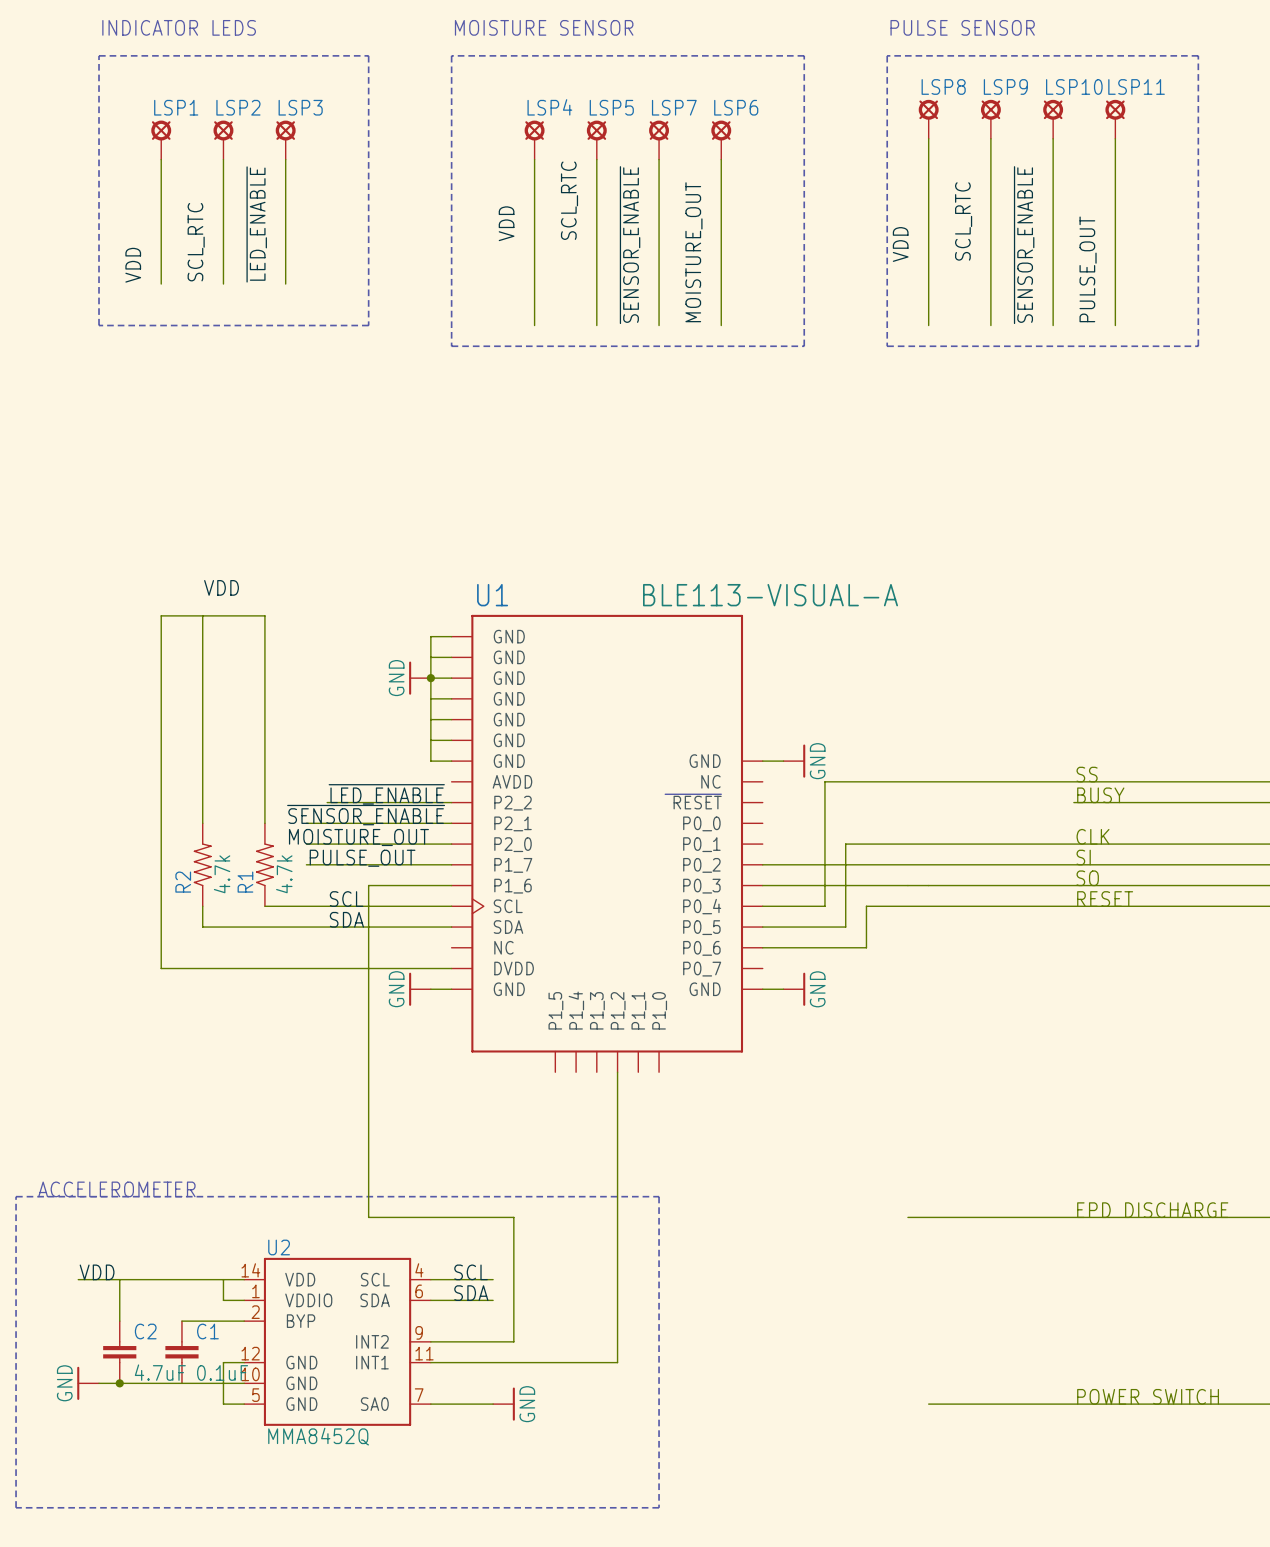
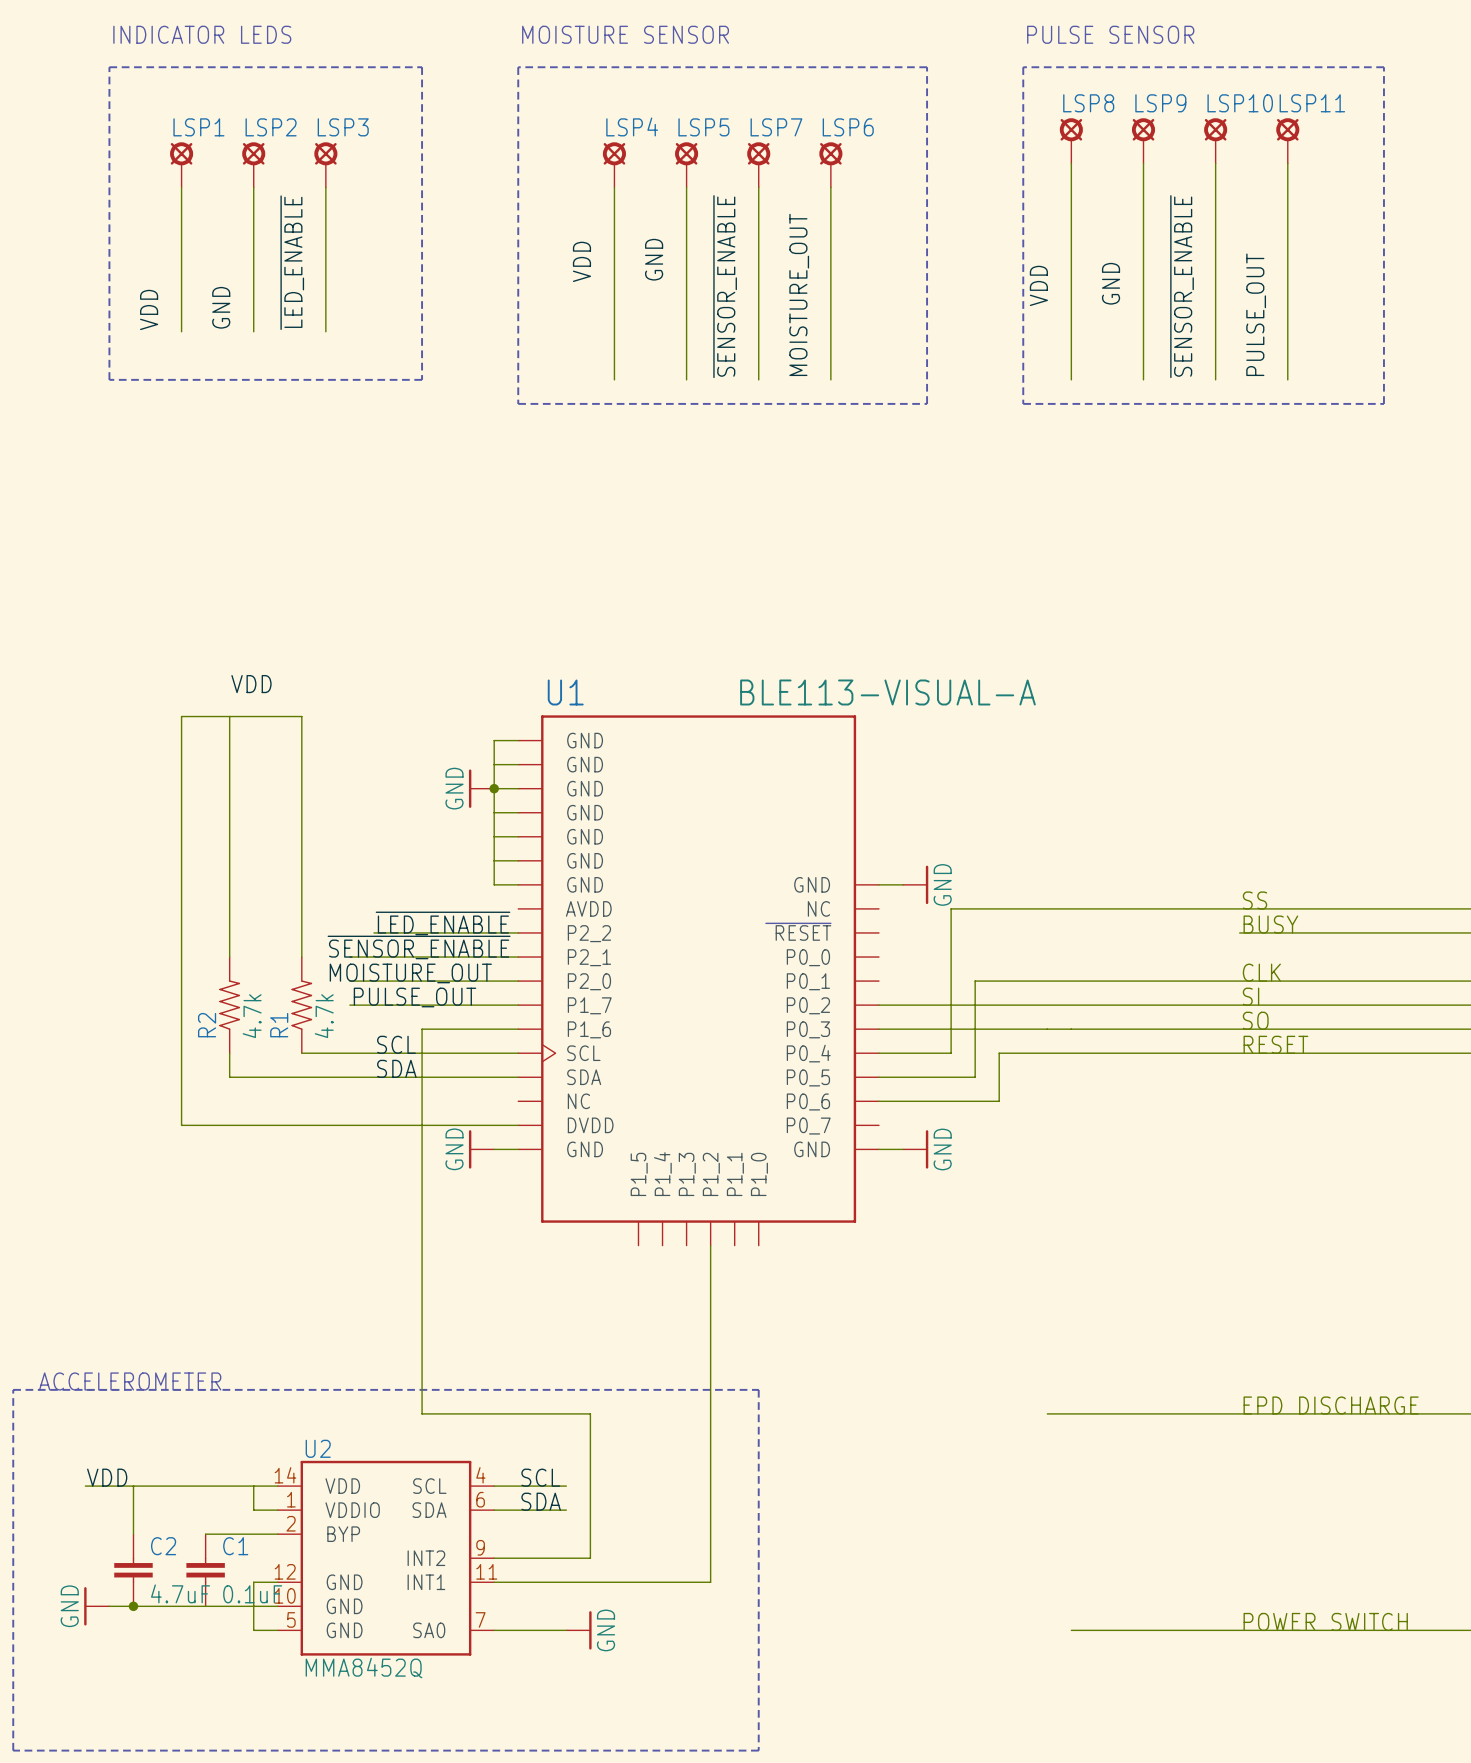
label: SCL_RTC (569, 200) -> GND (654, 259)
label: SCL_RTC (963, 221) -> GND (1111, 283)
label: SCL_RTC (196, 242) -> GND (221, 307)

